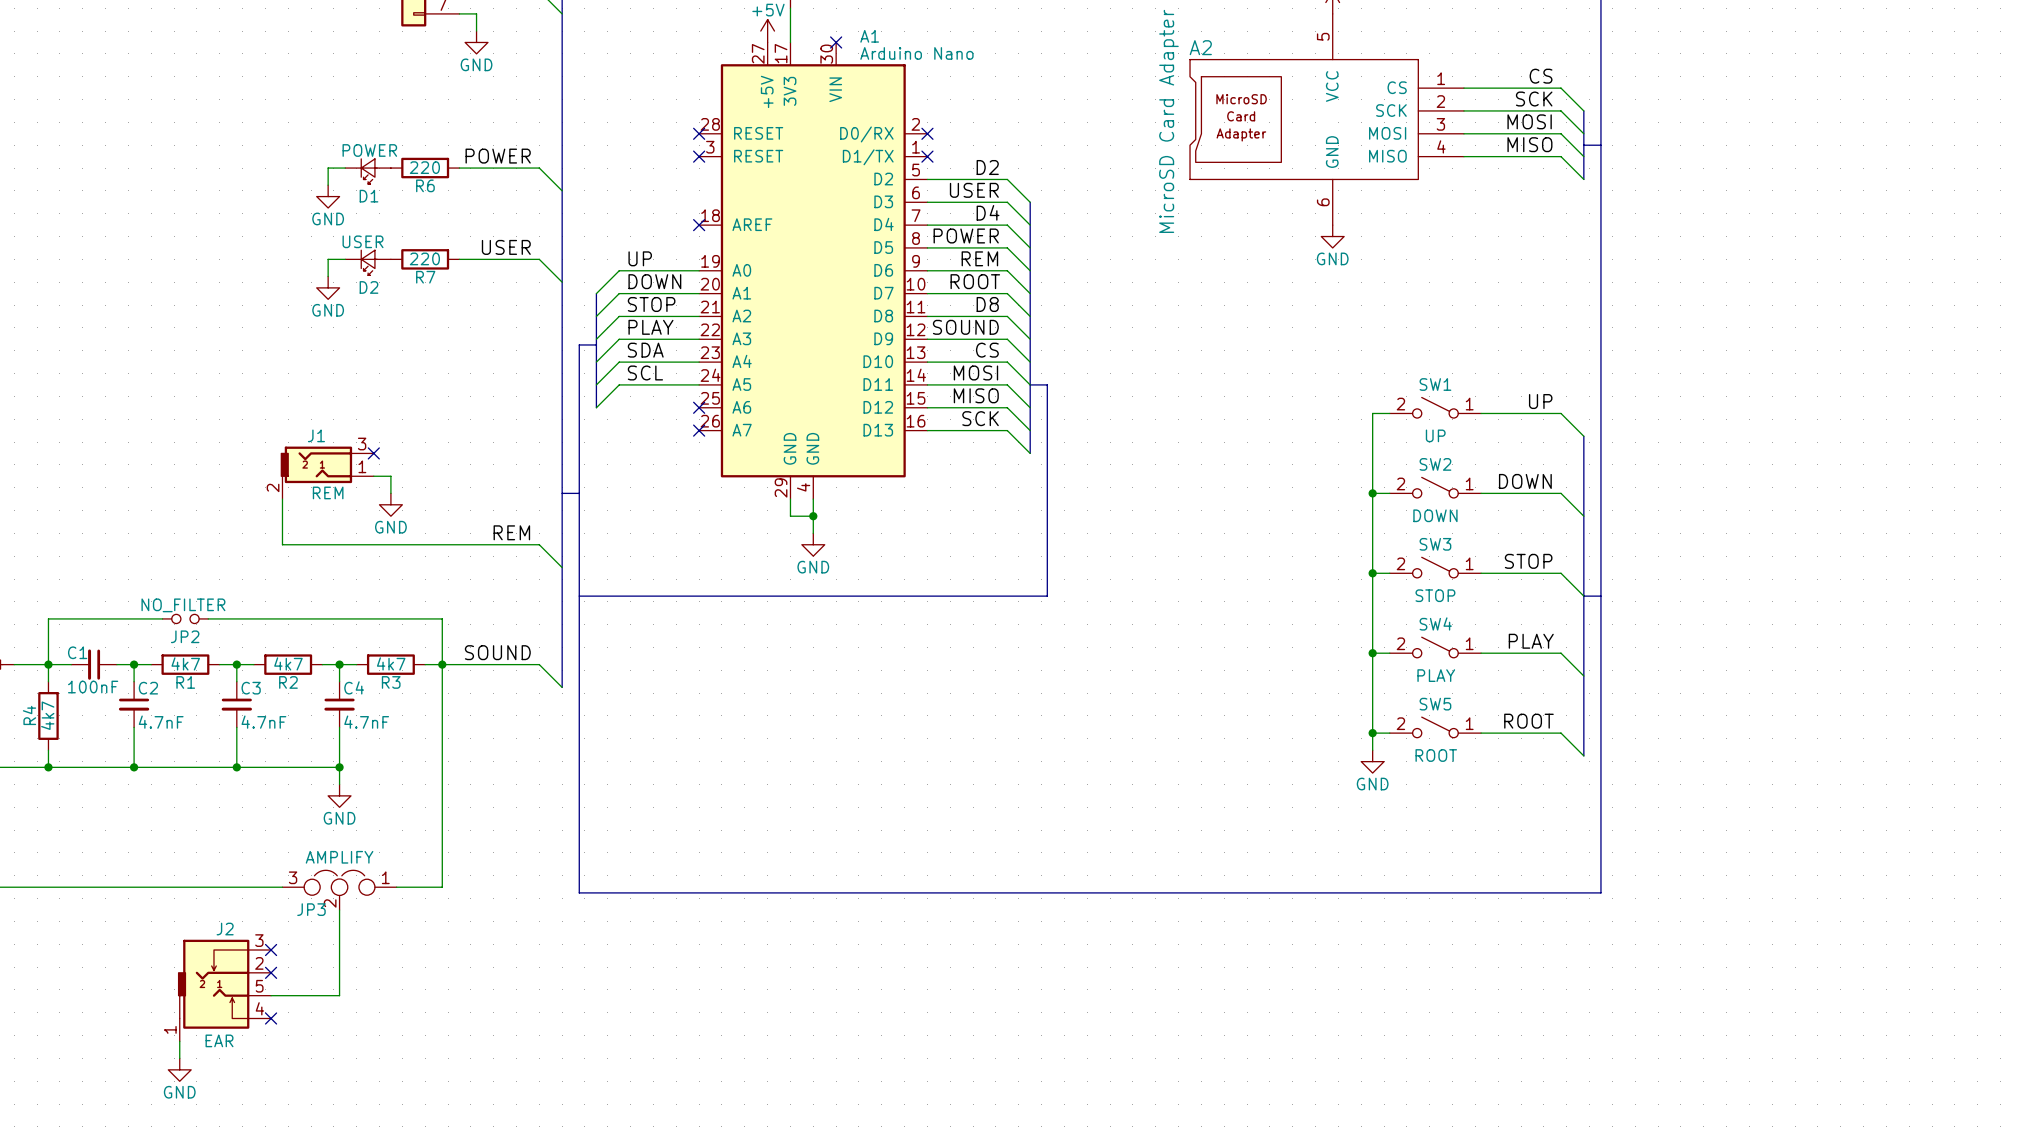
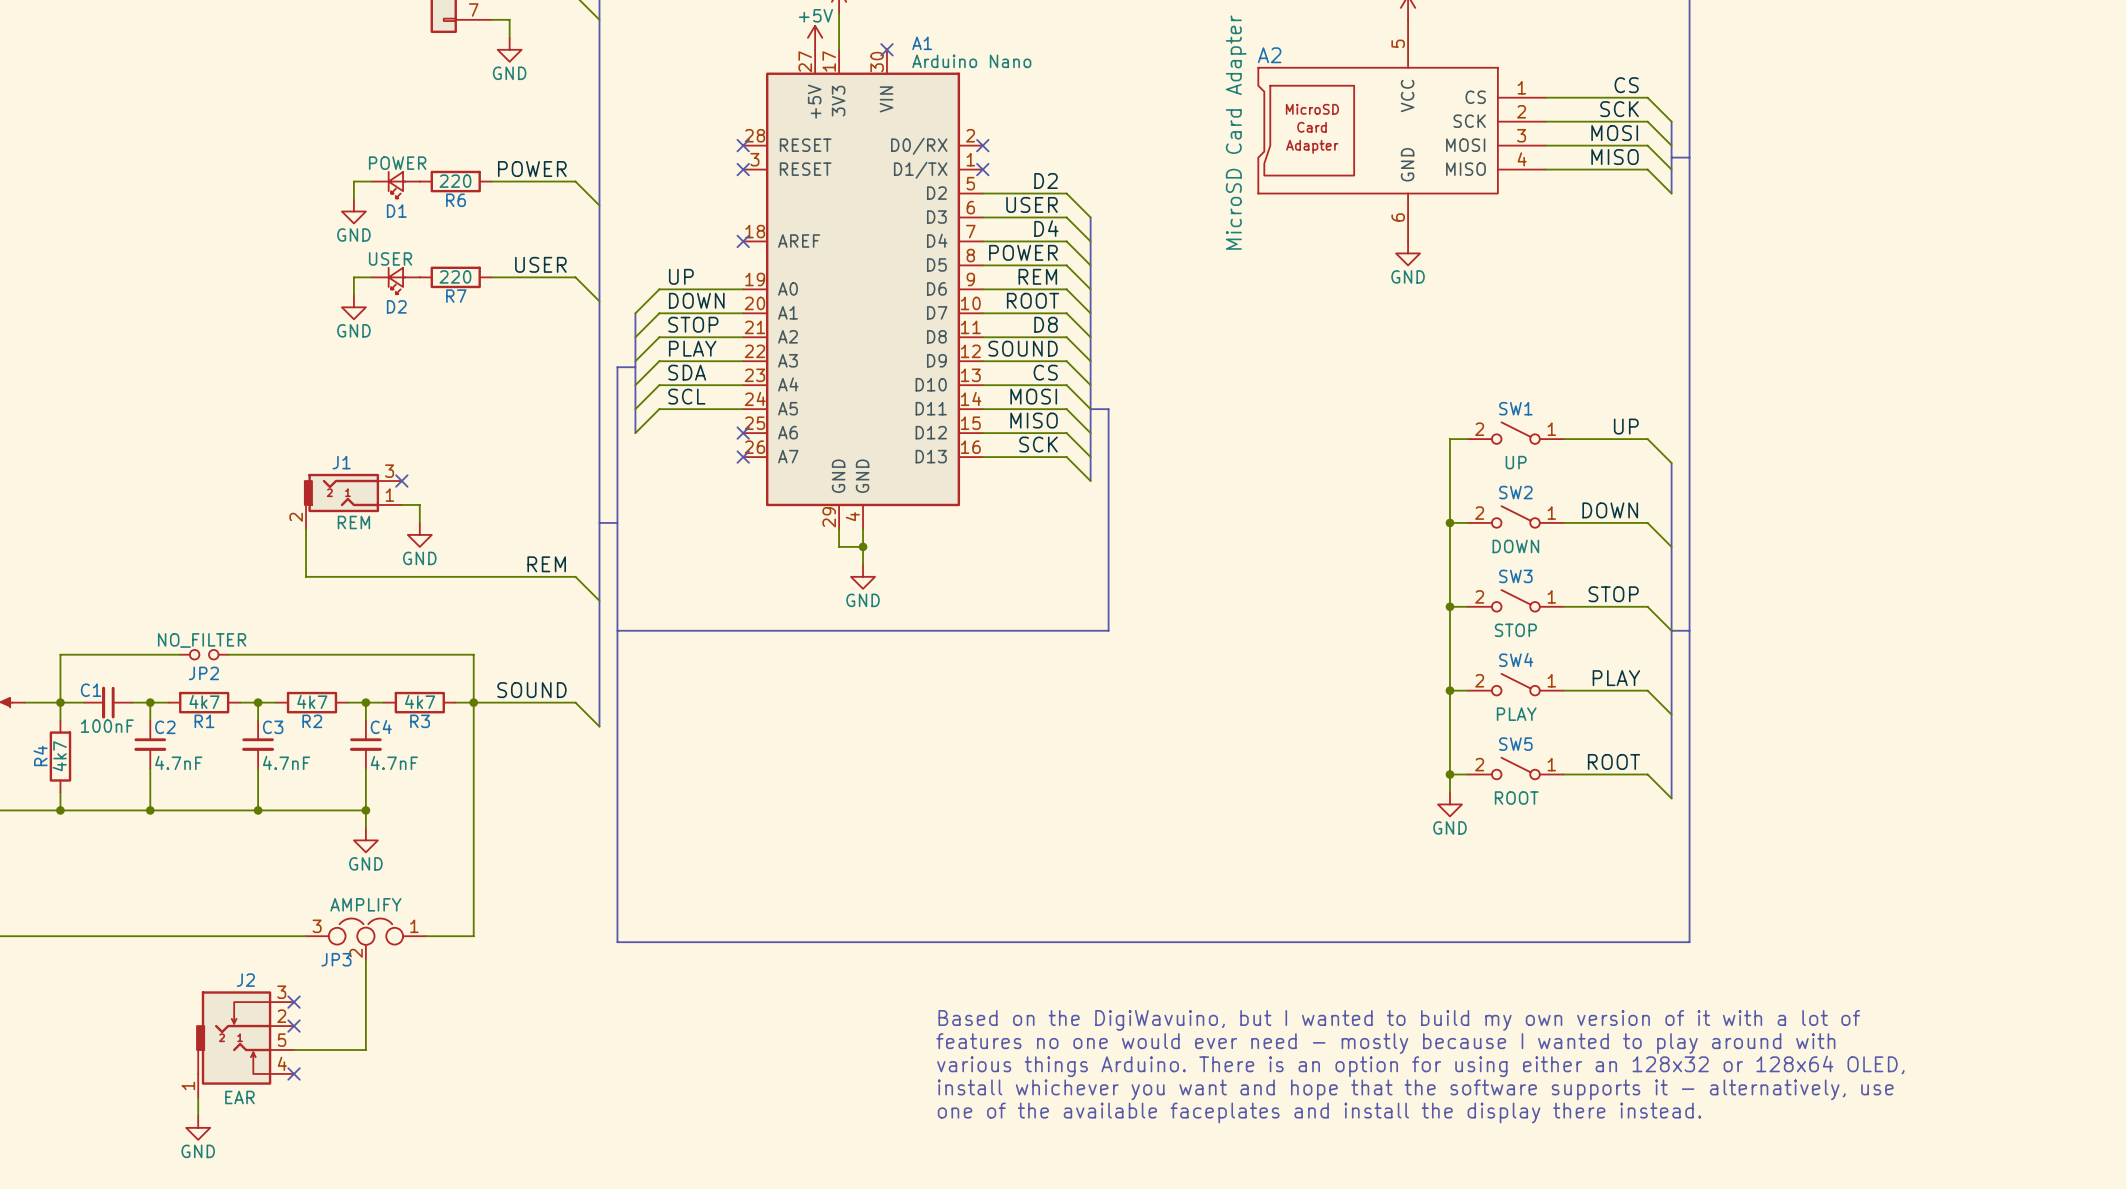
text: none -> Based on the DigiWavuino, but I wanted to build my own version of it with a lot of (1399, 1020)
text: none -> features no one would ever need - mostly because I wanted to play around with (1385, 1043)
text: none -> various things Arduino. There is an option for using either an 128x32 or 128x64 OLED, (1420, 1066)
text: none -> install whichever you want and hope that the software supports it - alternatively, use (1415, 1089)
text: none -> one of the available faceplates and install the display there instead. (1319, 1112)

